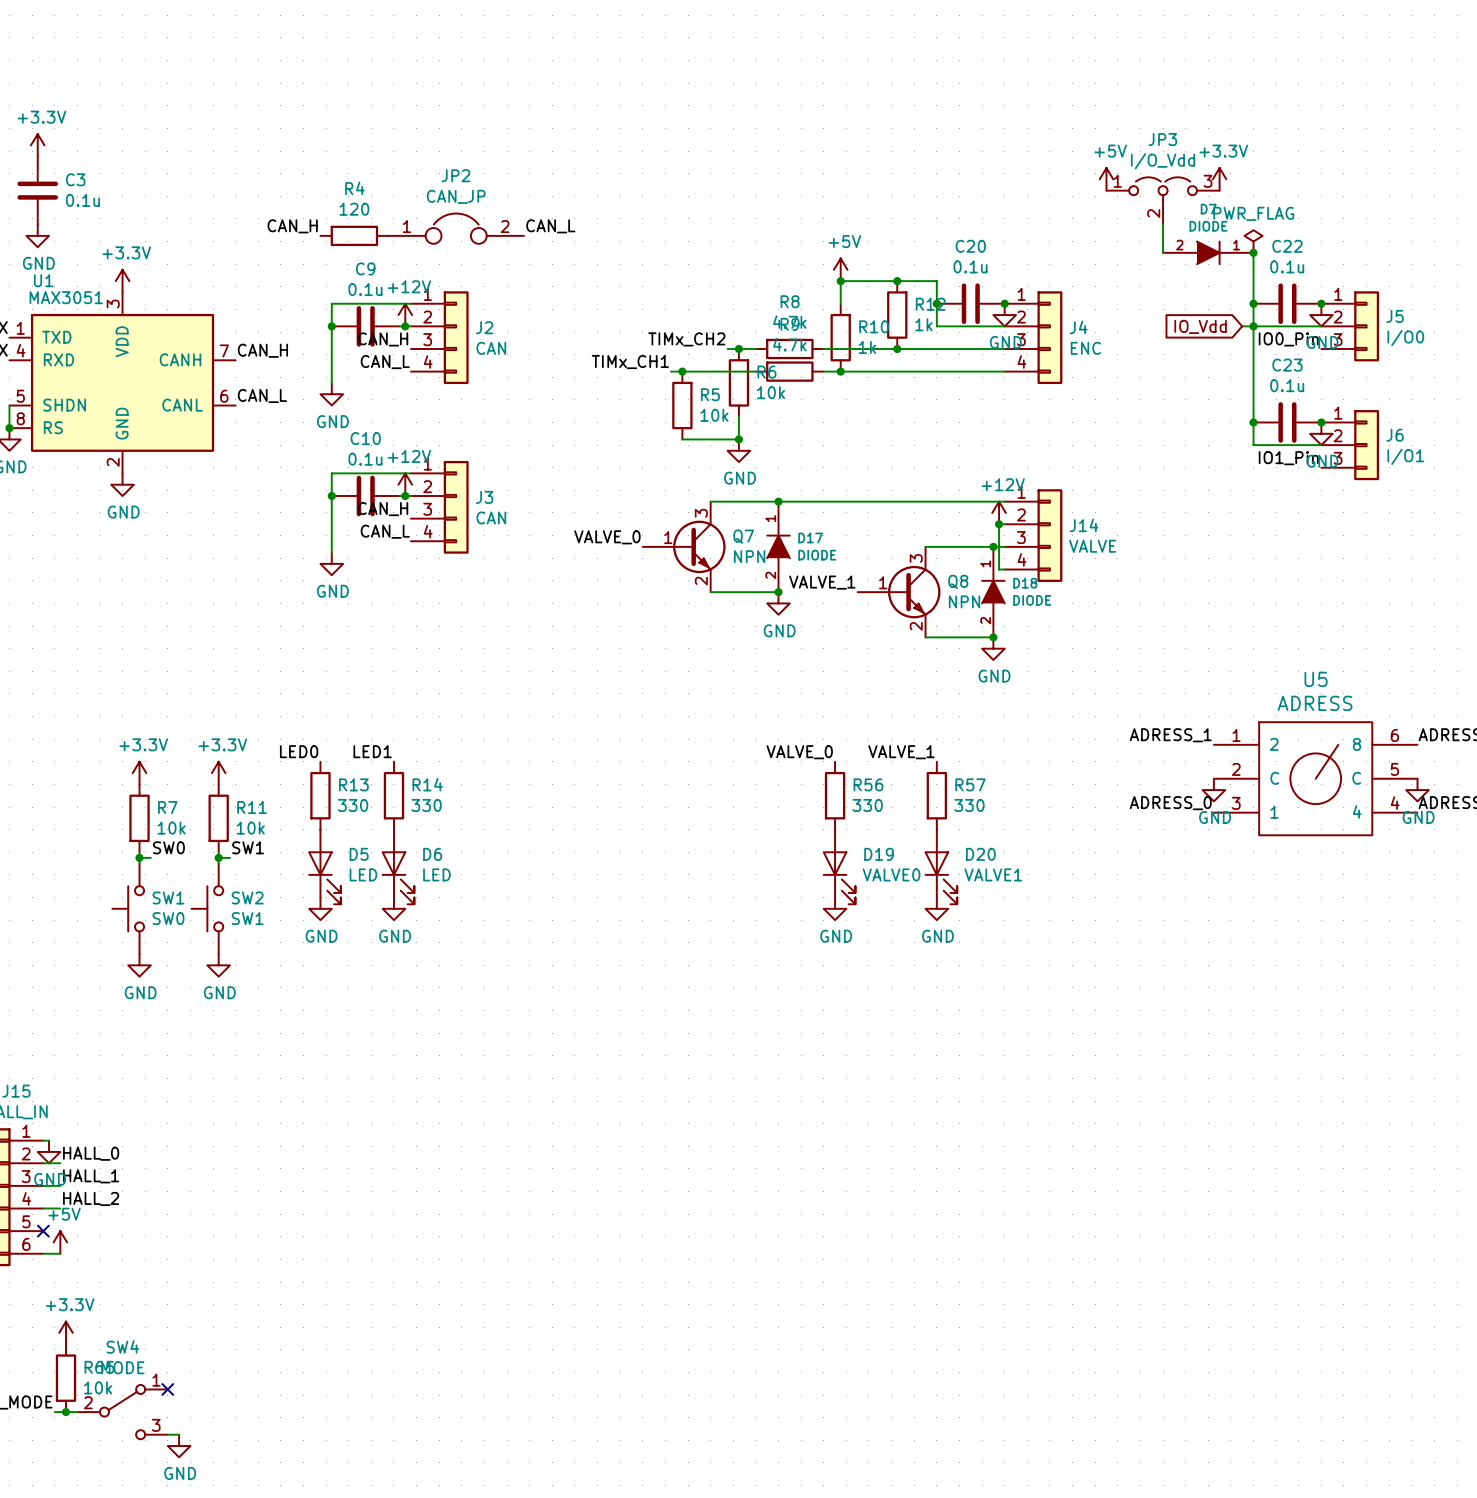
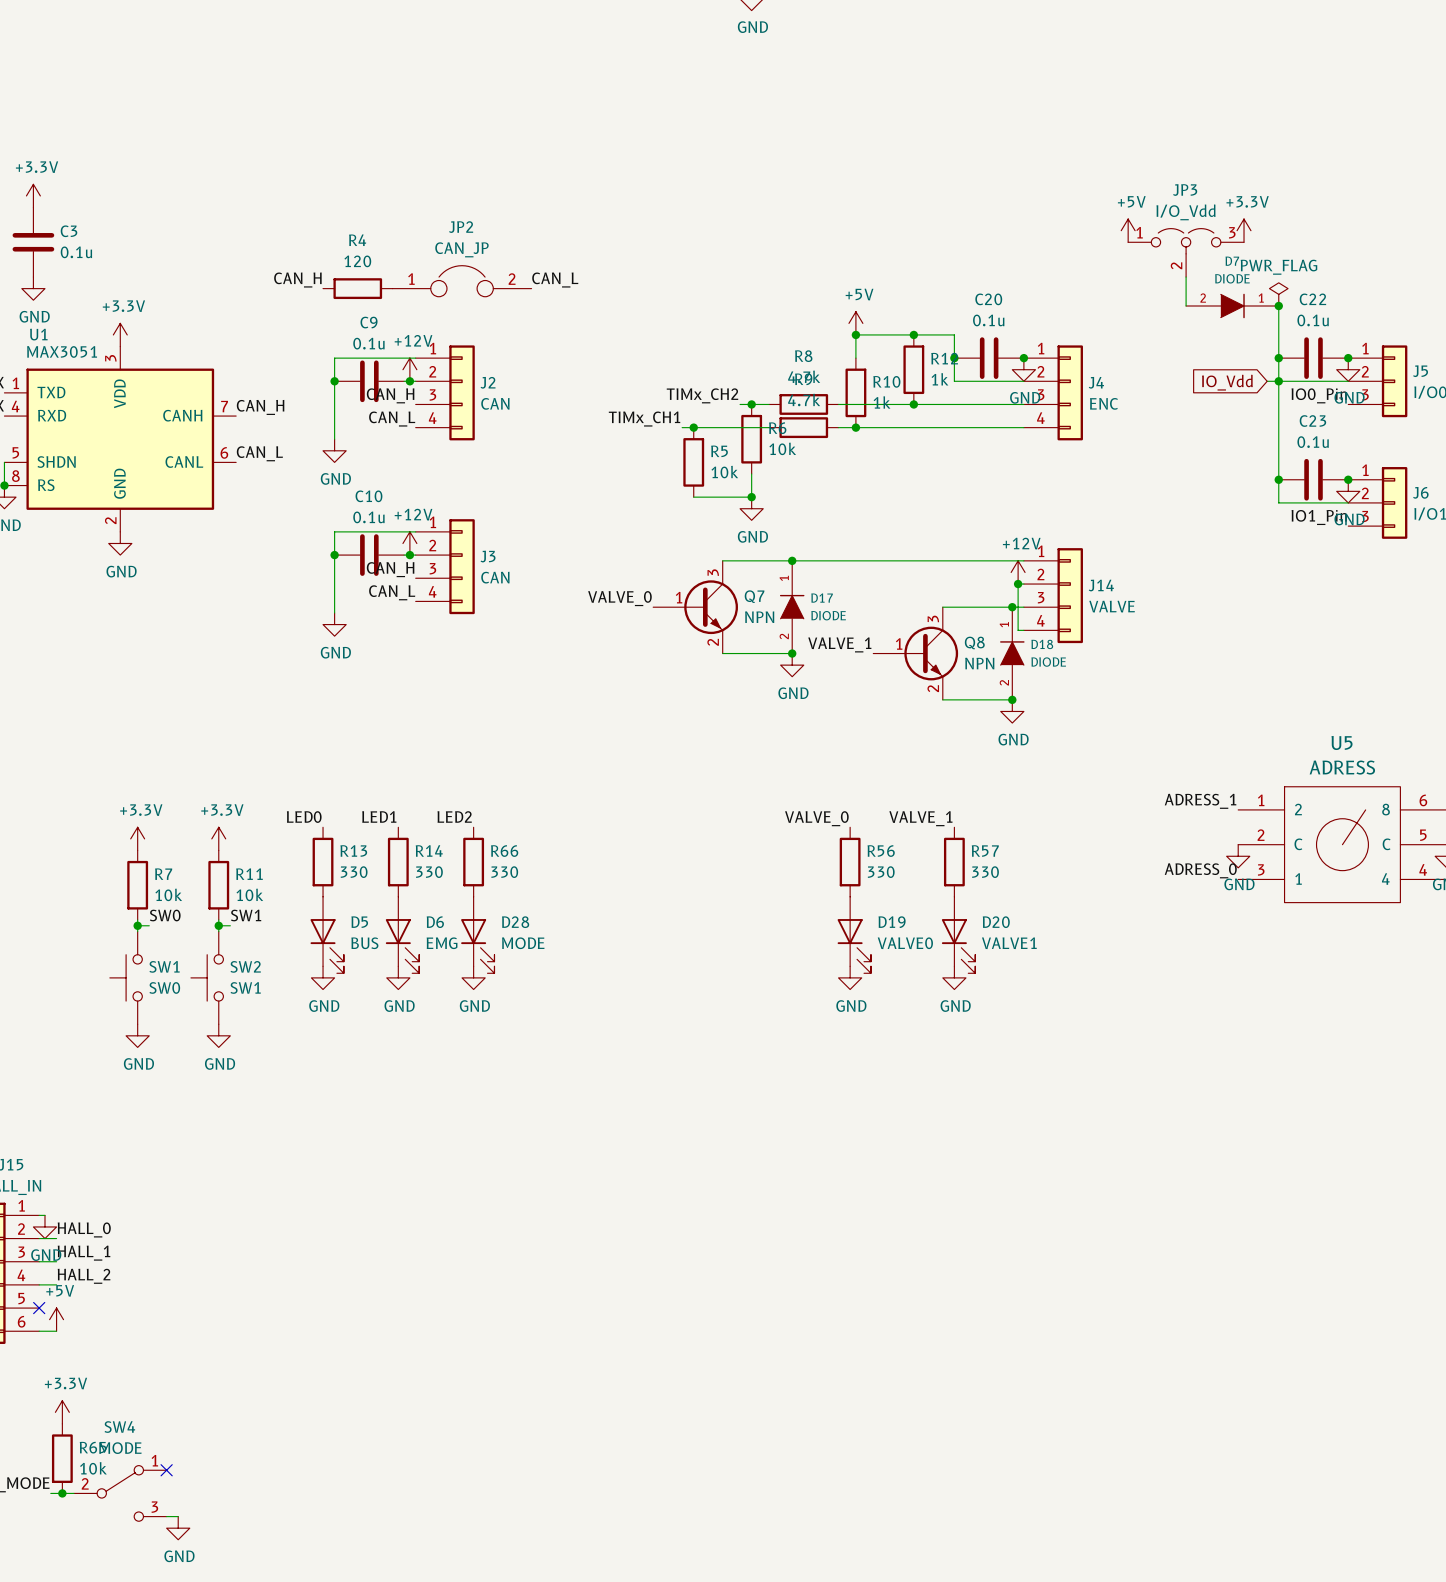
label: none -> LED2 (454, 816)
R66: none -> 330 (473, 862)
D28: none -> MODE (477, 935)
D5 value: LED (363, 874) -> BUS (364, 943)
D6 value: LED (436, 874) -> EMG (442, 943)
power symbol: none -> GND (473, 977)

